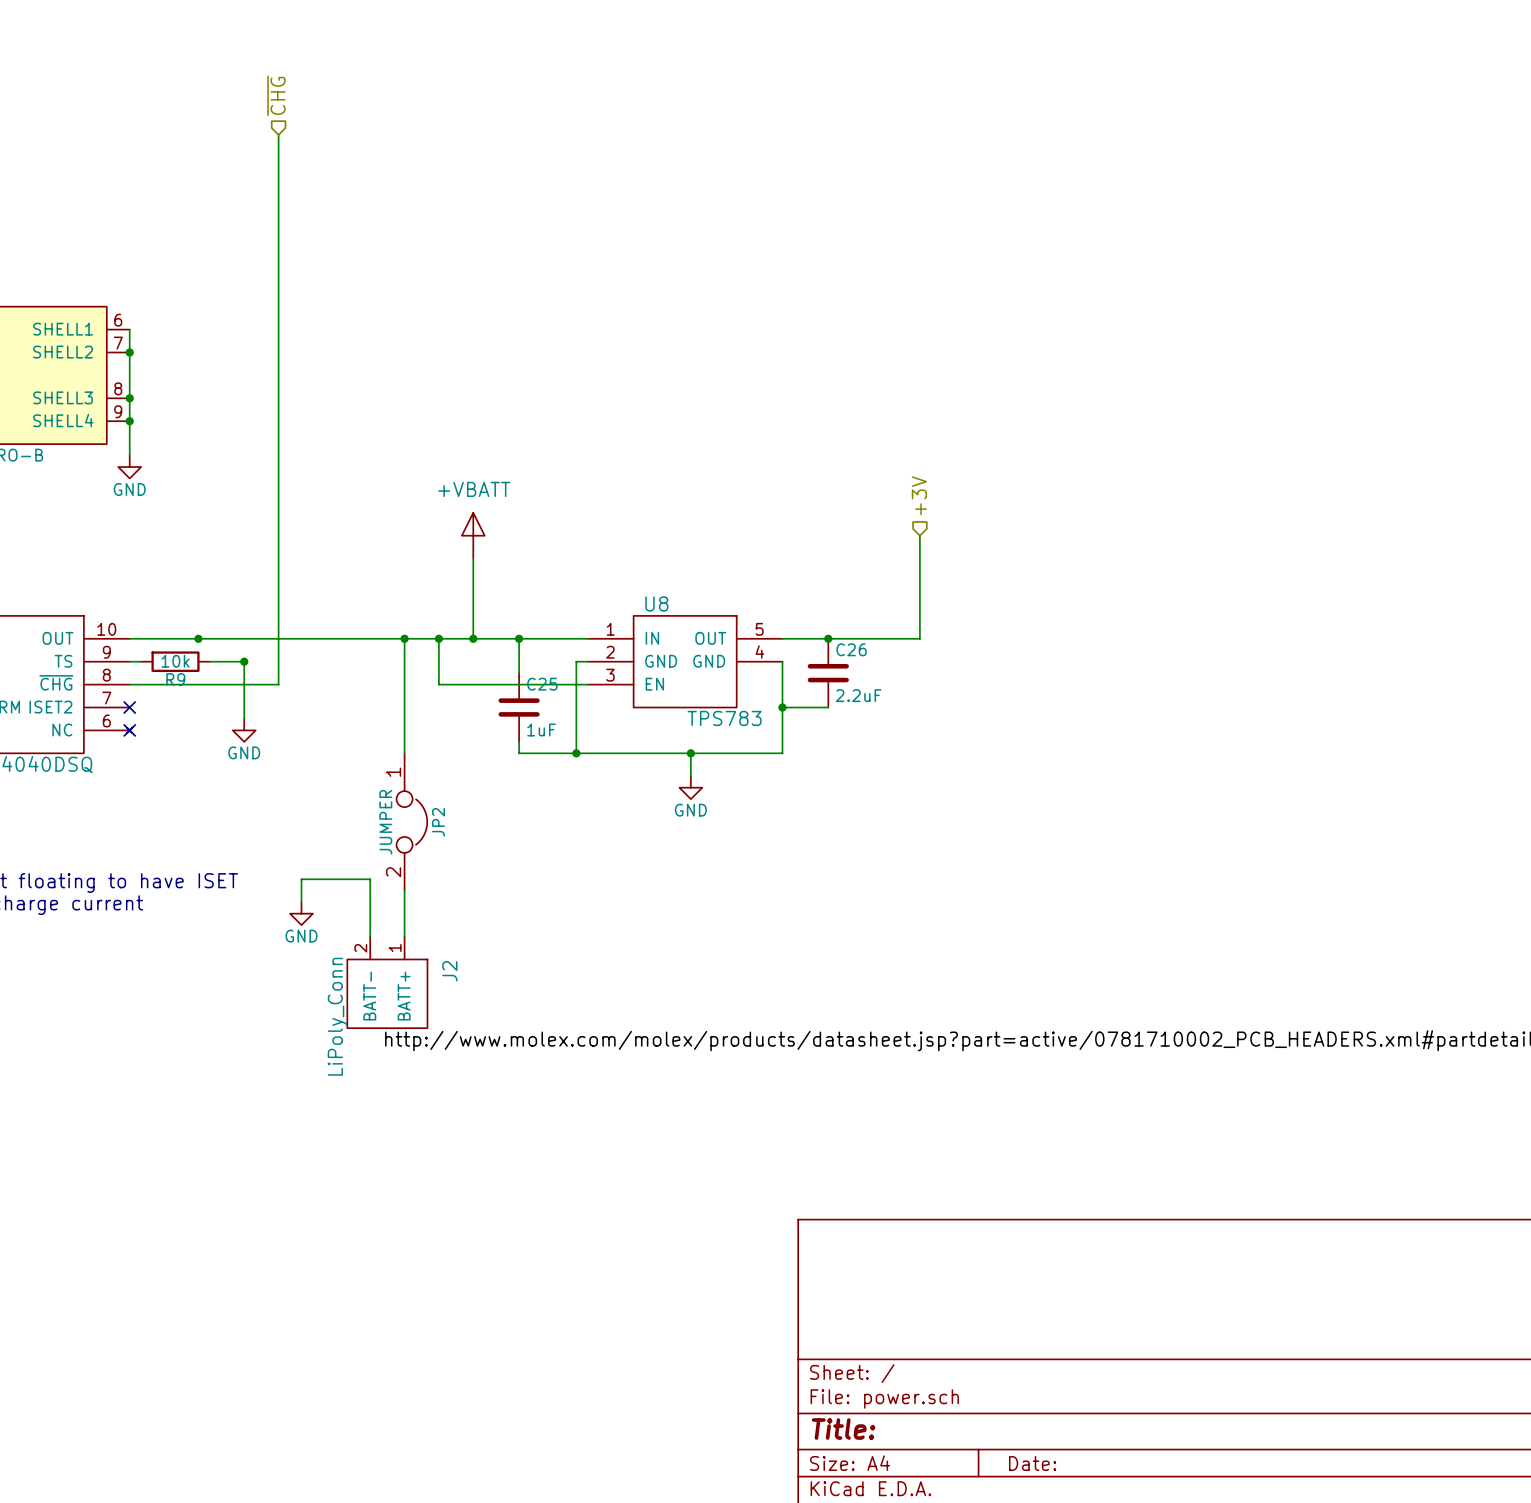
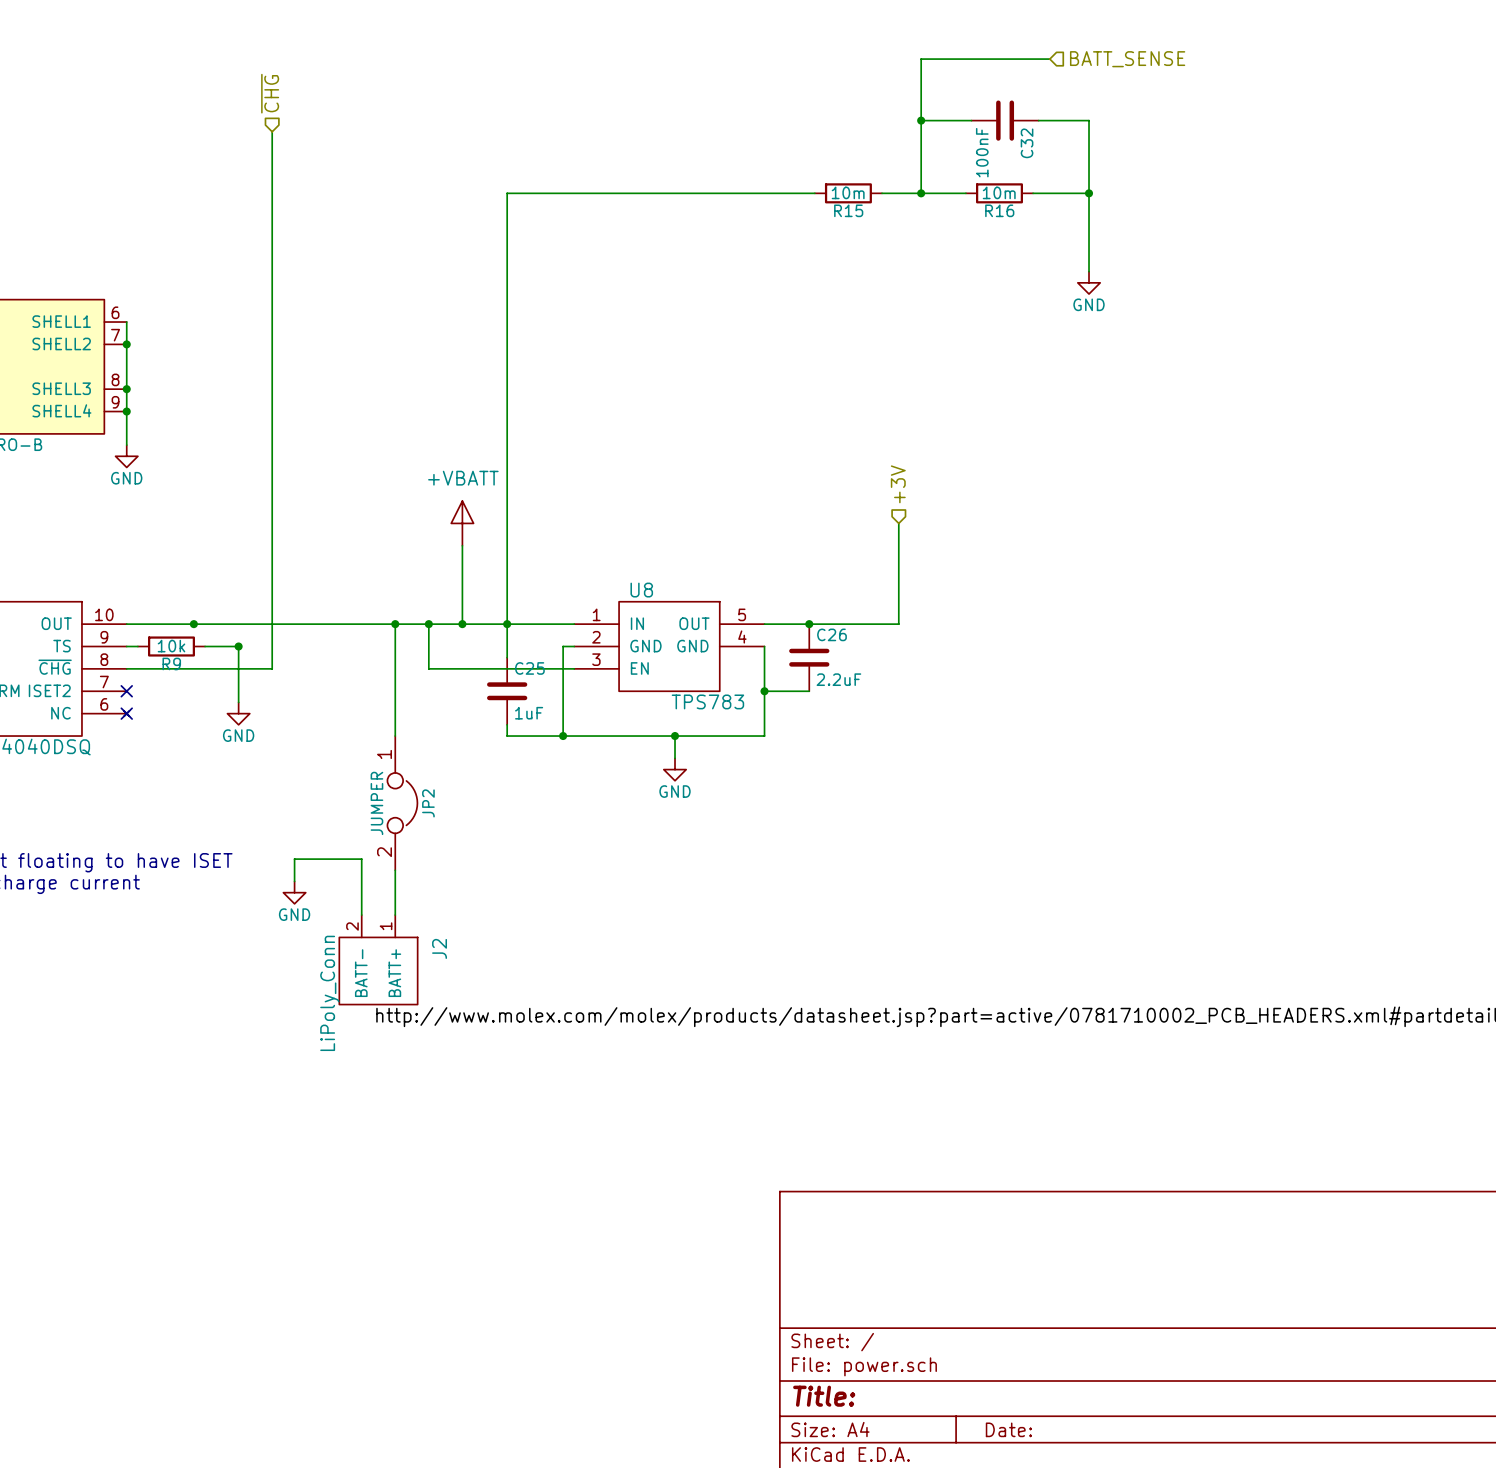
wire: none -> (1049, 59) (921, 59) (921, 193)
hierarchical label: none -> BATT_SENSE (1127, 59)
wire: none -> (921, 120) (971, 120)
junction: none -> (921, 120)
C32: none -> 100nF (1005, 120)
wire: none -> (1038, 120) (1089, 120) (1089, 271)
wire: none -> (814, 193) (507, 193) (507, 624)
R15: none -> 10m (848, 193)
wire: none -> (882, 193) (965, 193)
junction: none -> (921, 193)
R16: none -> 10m (999, 193)
wire: none -> (1033, 193) (1089, 193)
junction: none -> (1089, 193)
power symbol: none -> GND (1089, 282)

